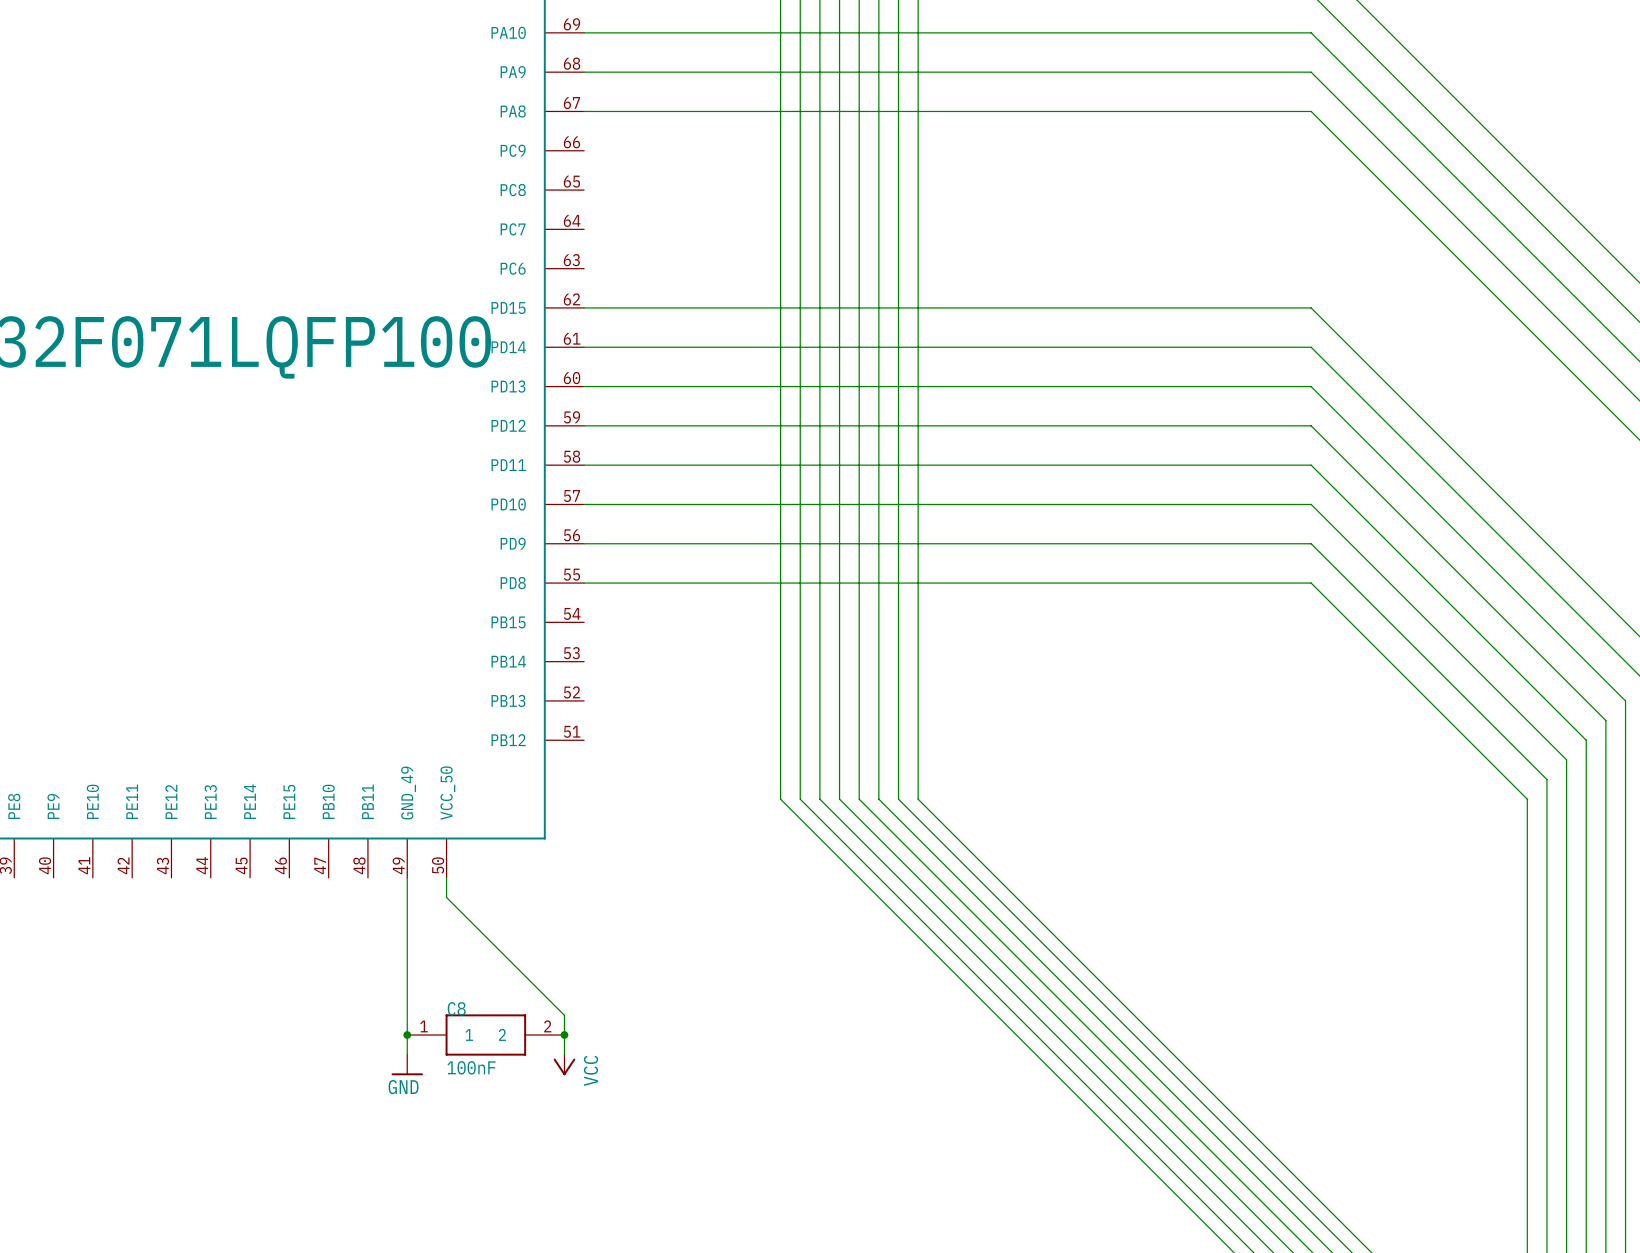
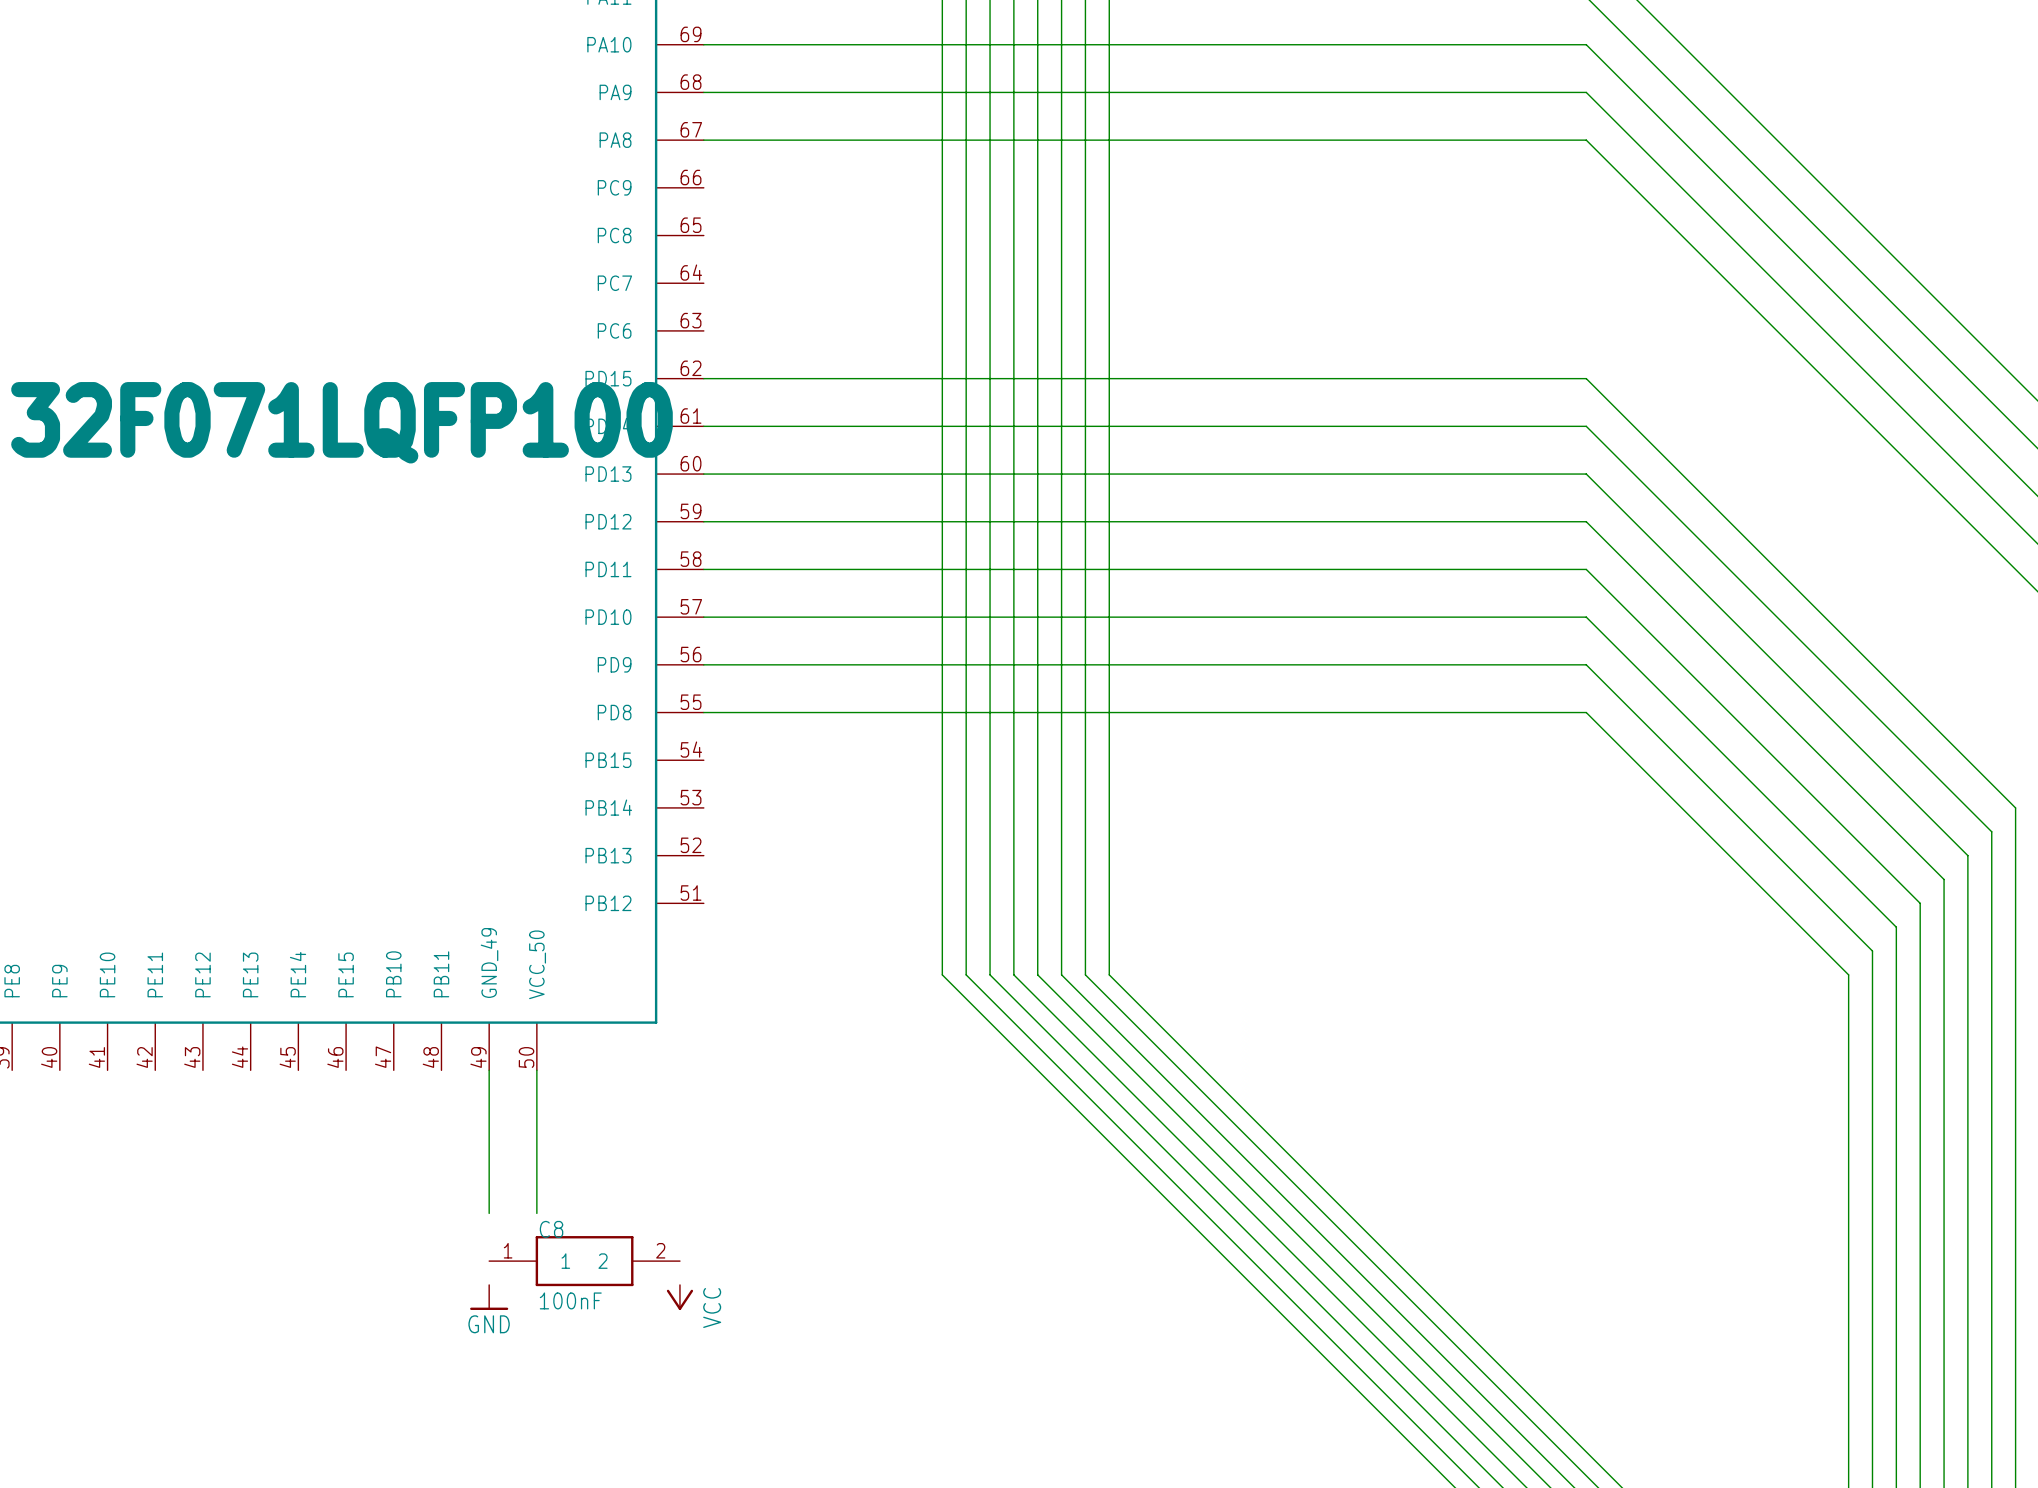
wire: (446, 897) (564, 1015) (564, 1054) -> (536, 1094) (536, 1213)
wire: (407, 995) (407, 1054) -> none
junction: (407, 1035) -> none
junction: (564, 1035) -> none

